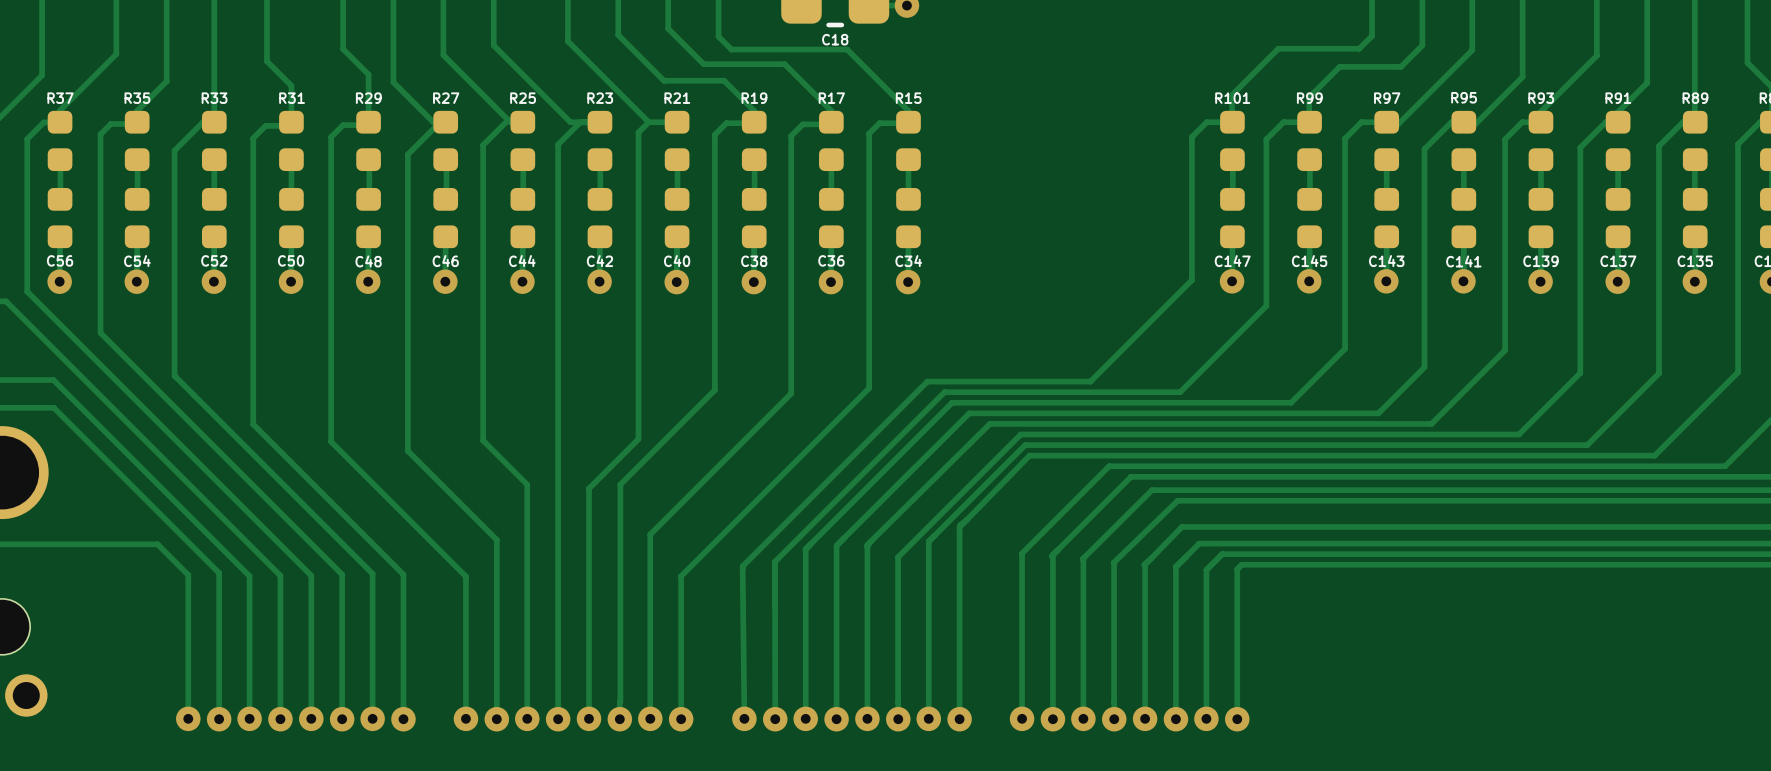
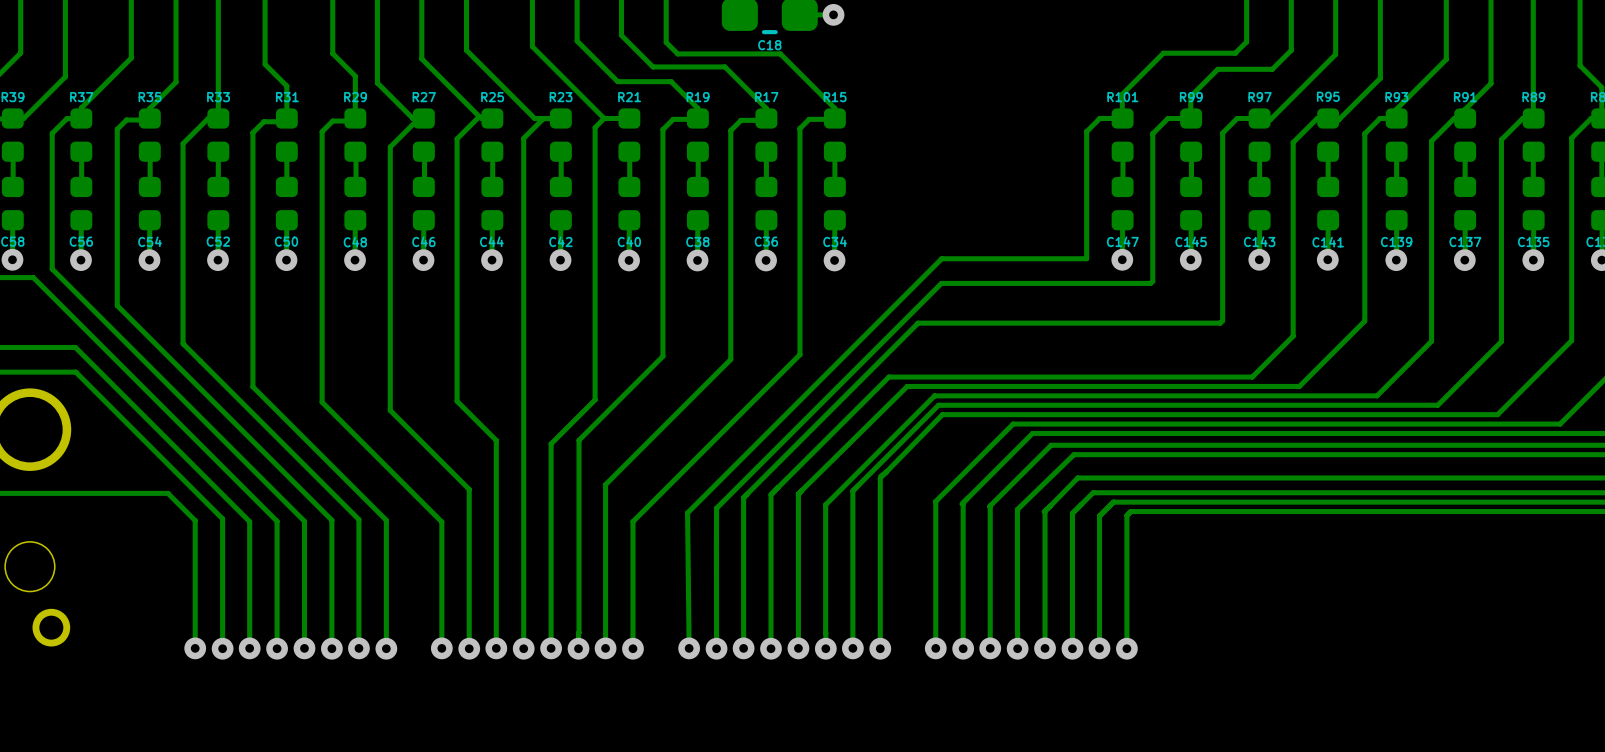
track: (1191, 280) (1090, 381) (927, 381) -> (1086, 258) (941, 258) (851, 348)
track: (1266, 305) (1180, 392) (944, 392) (775, 561) (775, 606) -> (1152, 281) (1150, 283) (941, 283) (716, 508) (716, 648)
track: (1345, 348) (1291, 402) (952, 402) -> (1222, 319) (1220, 323) (918, 323) (873, 367)

